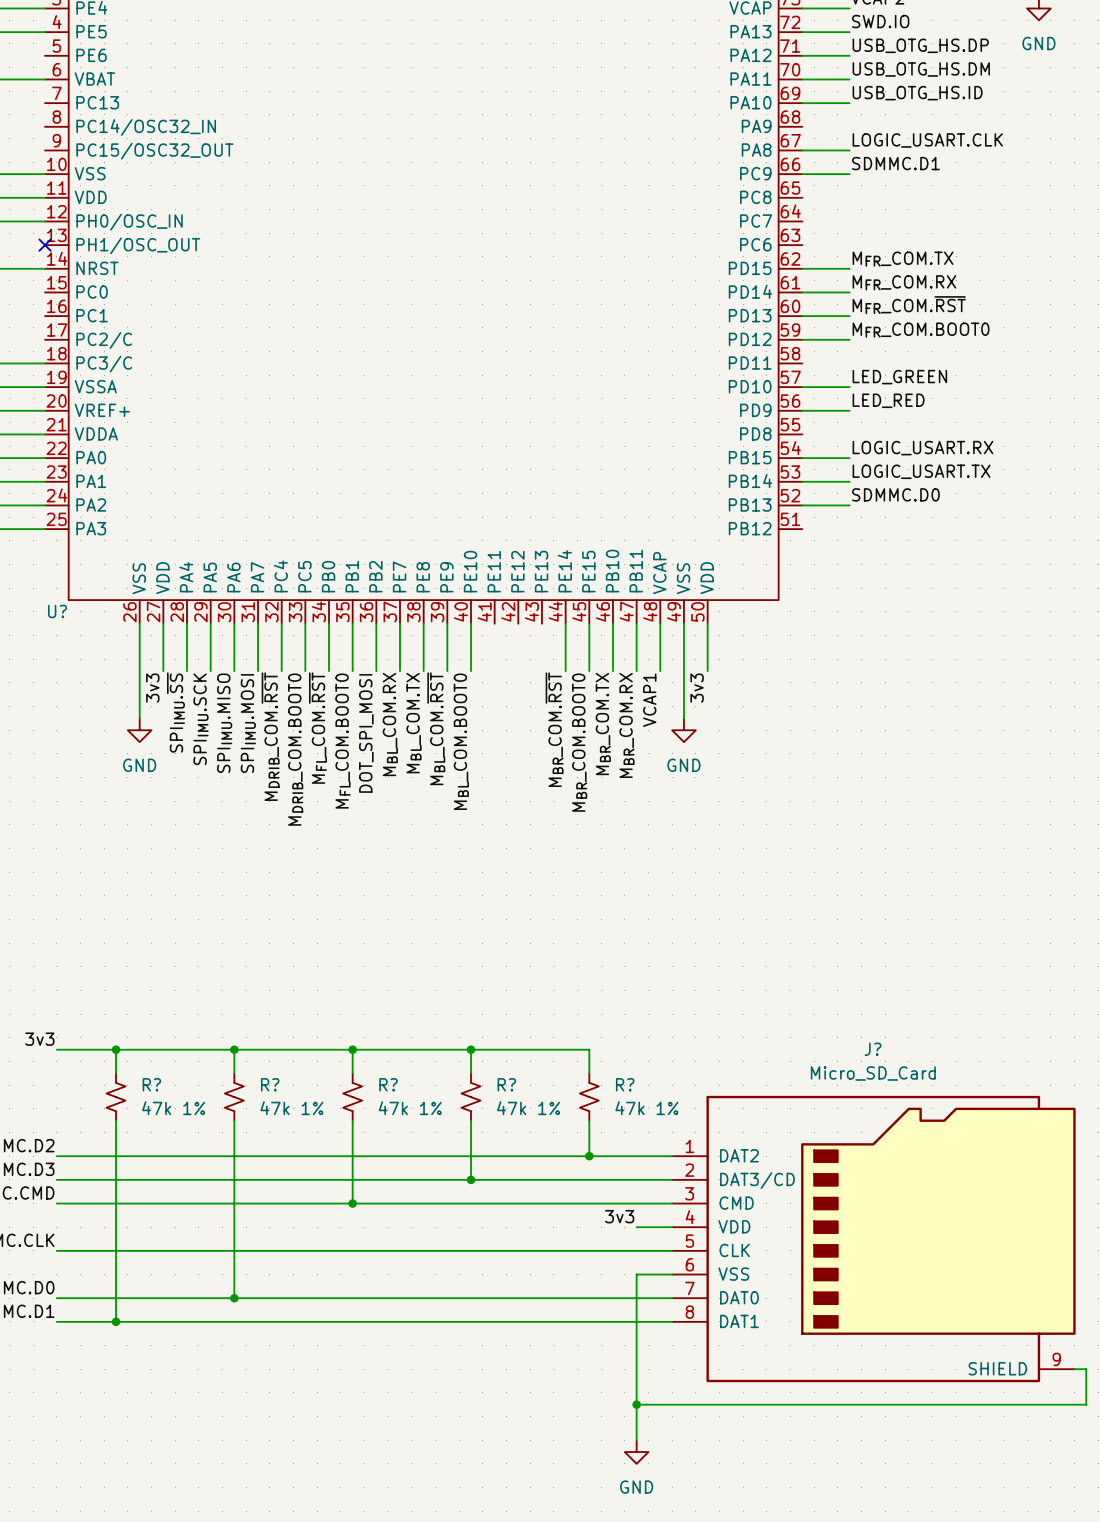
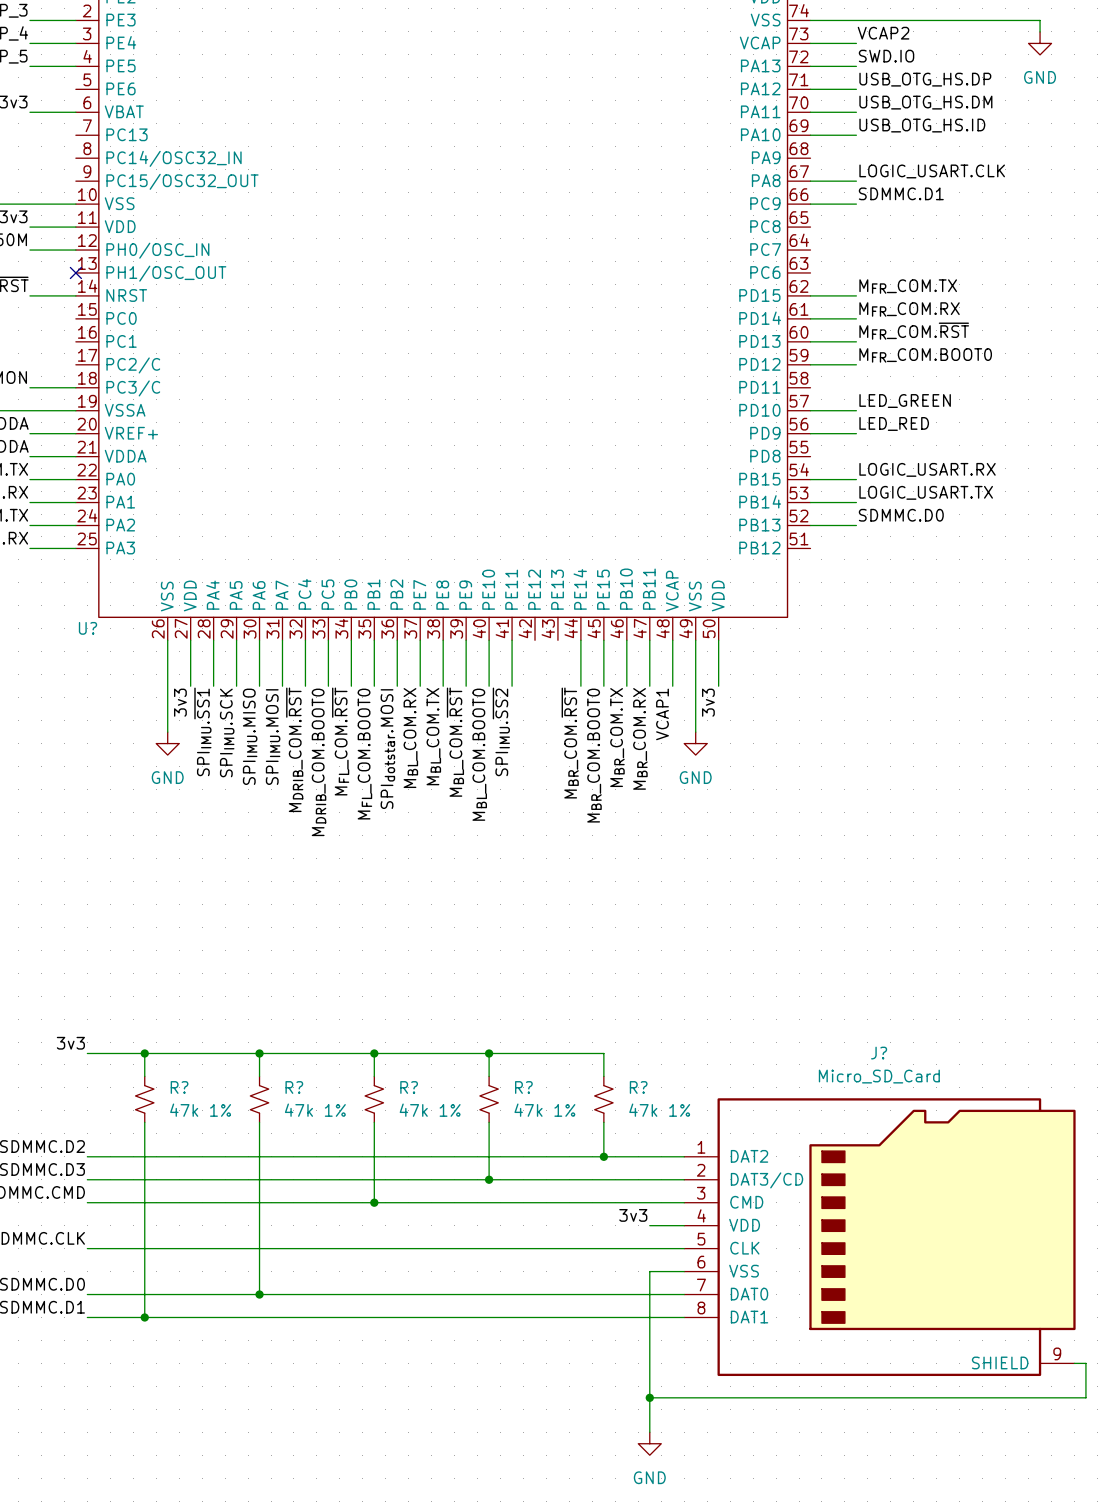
wire: none -> (512, 640) (512, 686)
label: SPIIMU.~{SS} (175, 712) -> SPIIMU.~{SS1} (202, 731)
label: none -> SPIIMU.~{SS2} (501, 731)
label: DOT_SPI_MOSI (366, 733) -> SPIdotstar.MOSI (387, 749)

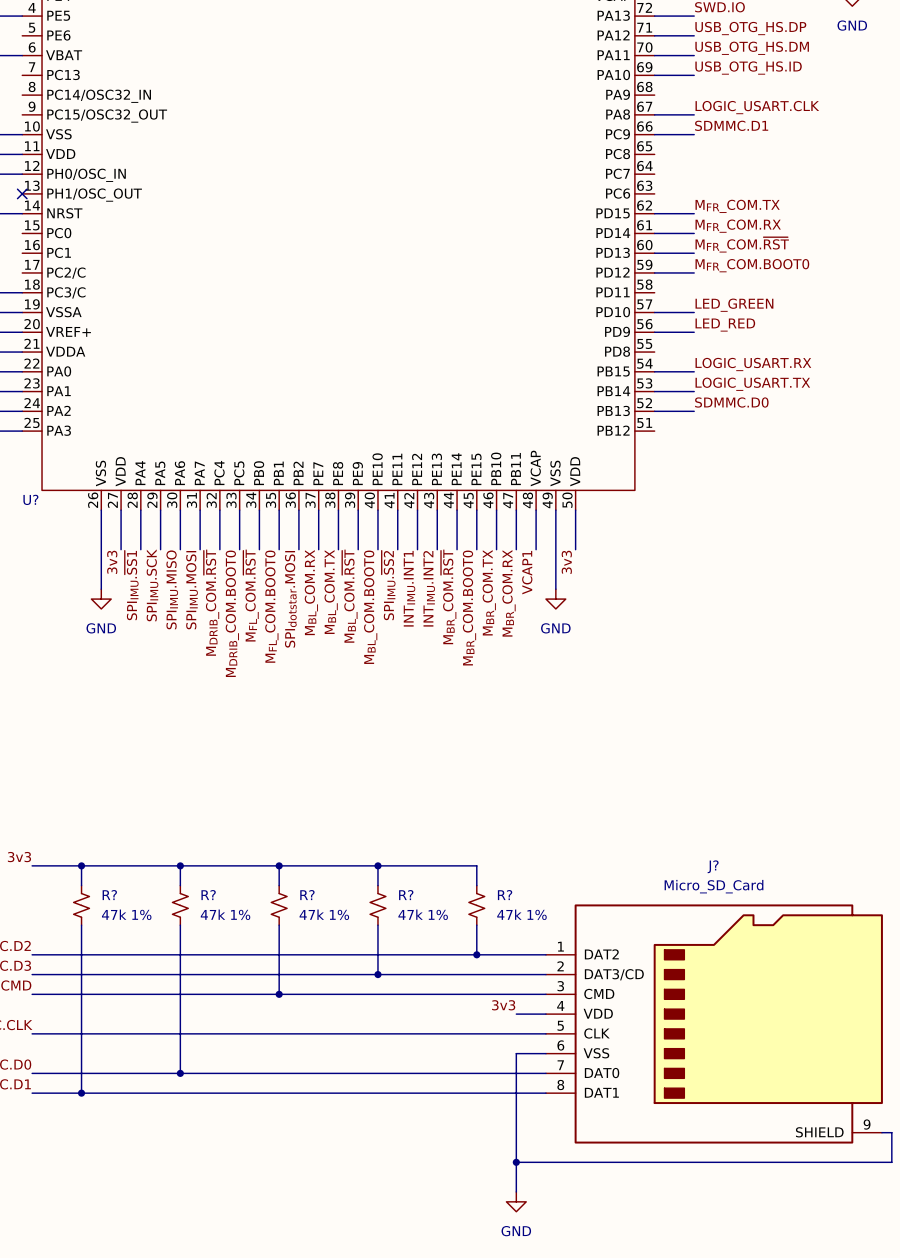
wire: none -> (417, 510) (417, 549)
wire: none -> (437, 510) (437, 549)
label: none -> INTIMU.INT1 (409, 588)
label: none -> INTIMU.INT2 (429, 588)

